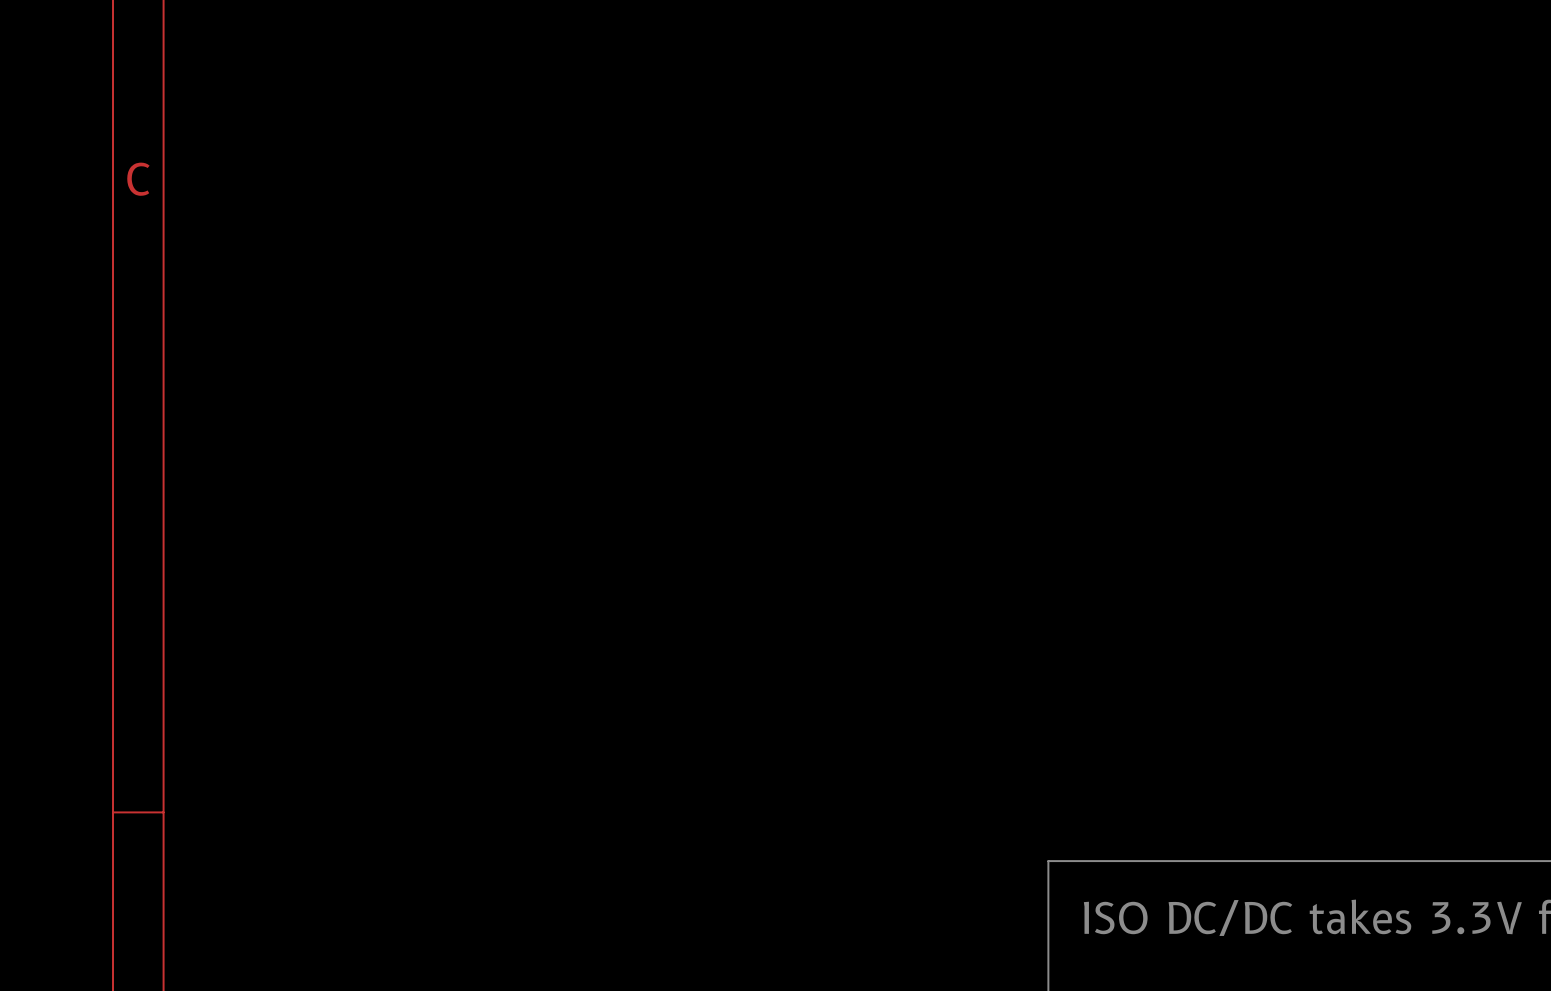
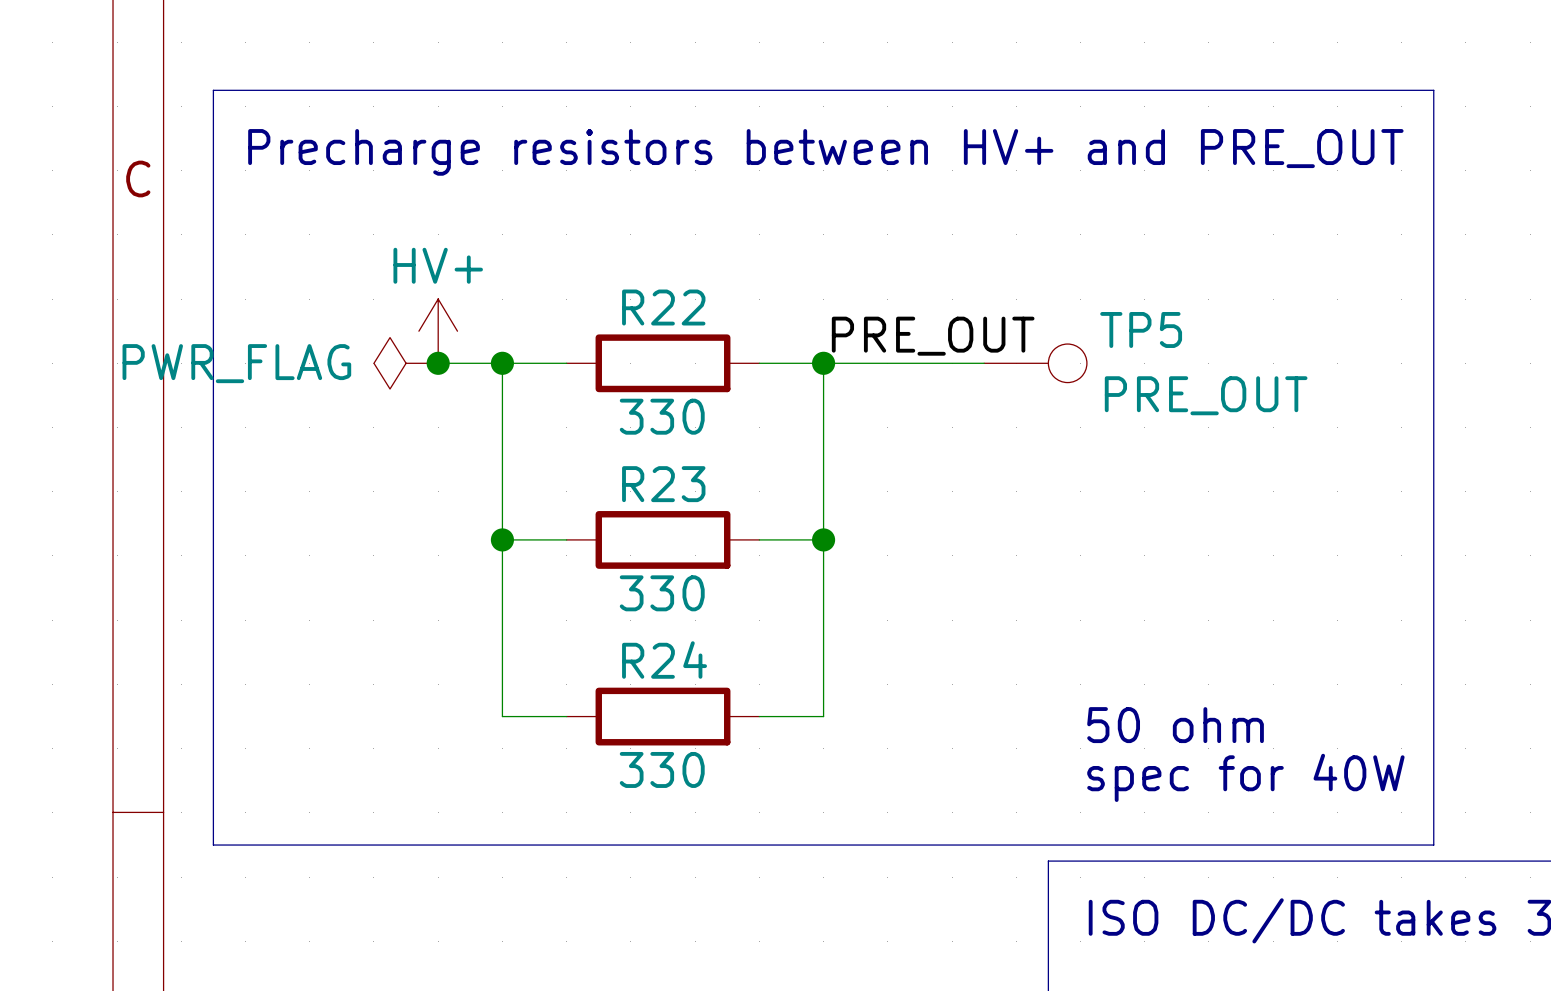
line: none -> (213, 90) (1433, 90) (1433, 845) (213, 845) (213, 90)
text: none -> Precharge resistors between HV+ and PRE_OUT (825, 152)
power symbol: none -> HV+ (438, 331)
label: none -> PRE_OUT (933, 336)
power symbol: none -> PWR_FLAG (406, 363)
wire: none -> (438, 363) (566, 363)
junction: none -> (438, 363)
wire: none -> (502, 363) (502, 716) (566, 716)
junction: none -> (502, 363)
R22: none -> 330 (663, 363)
wire: none -> (759, 363) (984, 363)
wire: none -> (823, 363) (823, 716) (759, 716)
junction: none -> (823, 363)
TP5: none -> PRE_OUT (1035, 363)
wire: none -> (502, 539) (566, 539)
junction: none -> (502, 539)
R23: none -> 330 (663, 539)
wire: none -> (759, 539) (823, 539)
junction: none -> (823, 539)
R24: none -> 330 (663, 716)
text: none -> 50 ohm (1175, 725)
text: none -> spec for 40W (1245, 777)

